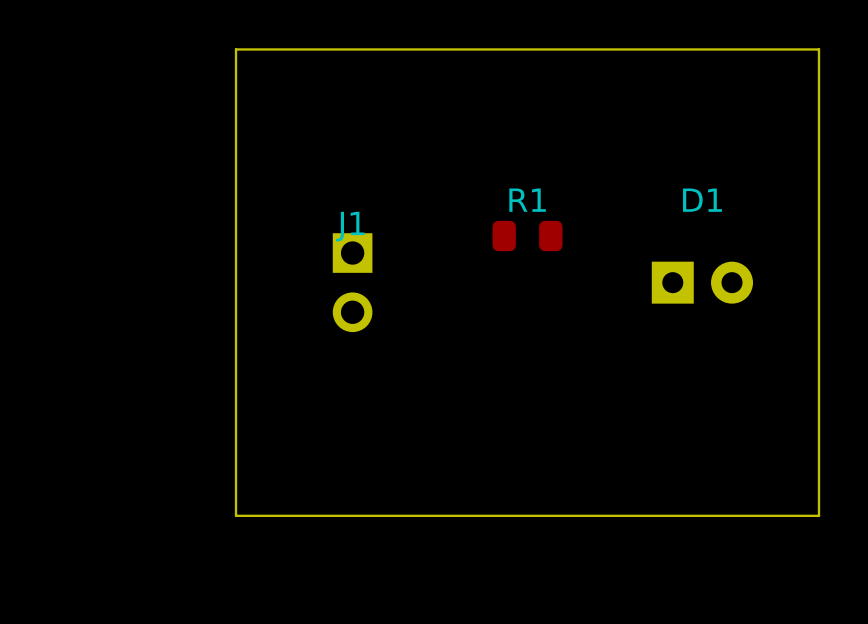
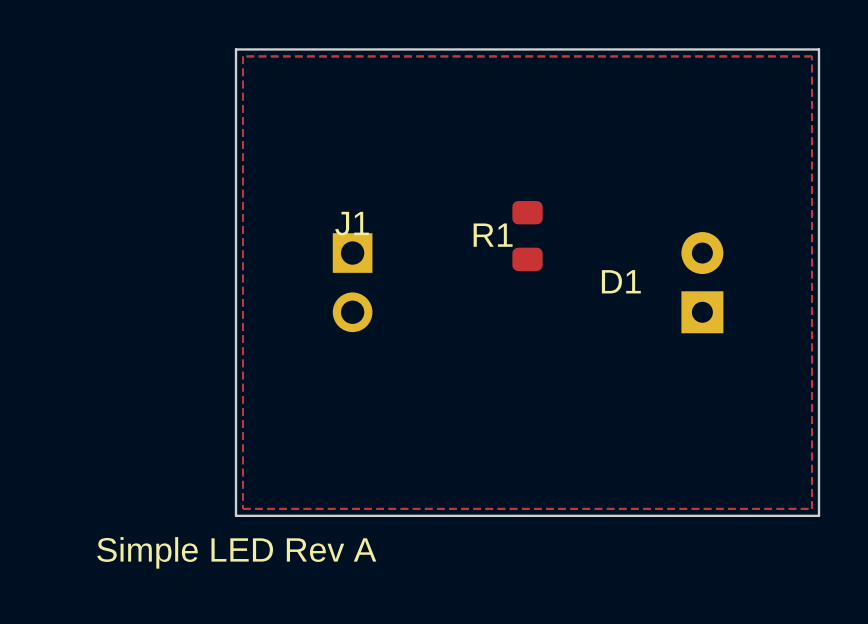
top zone outline: none -> (243, 56) (243, 508) (812, 508) (812, 56) (243, 56)
R1 name position: R1 (527, 200) -> R1 (493, 235)
R1 rotation: 0° (527, 236) -> 90° clockwise (527, 236)
D1 rotation: 0° (702, 282) -> 90° counterclockwise (702, 282)
text: none -> Simple LED Rev A (236, 552)

